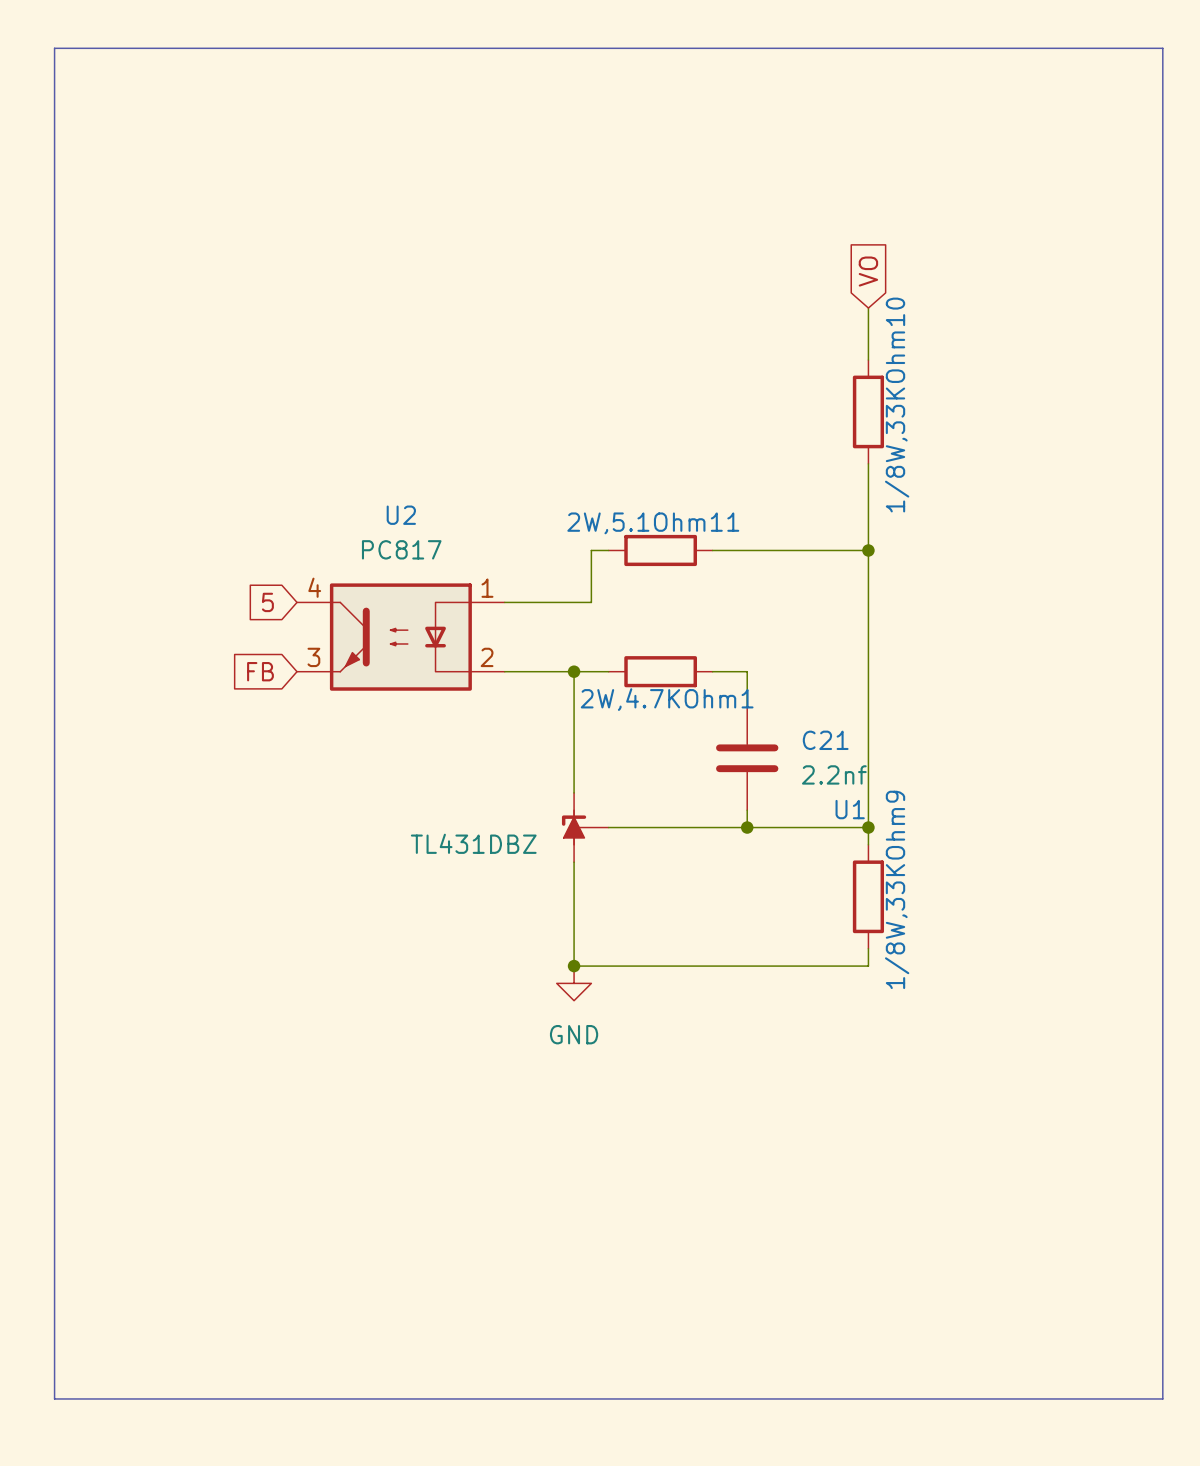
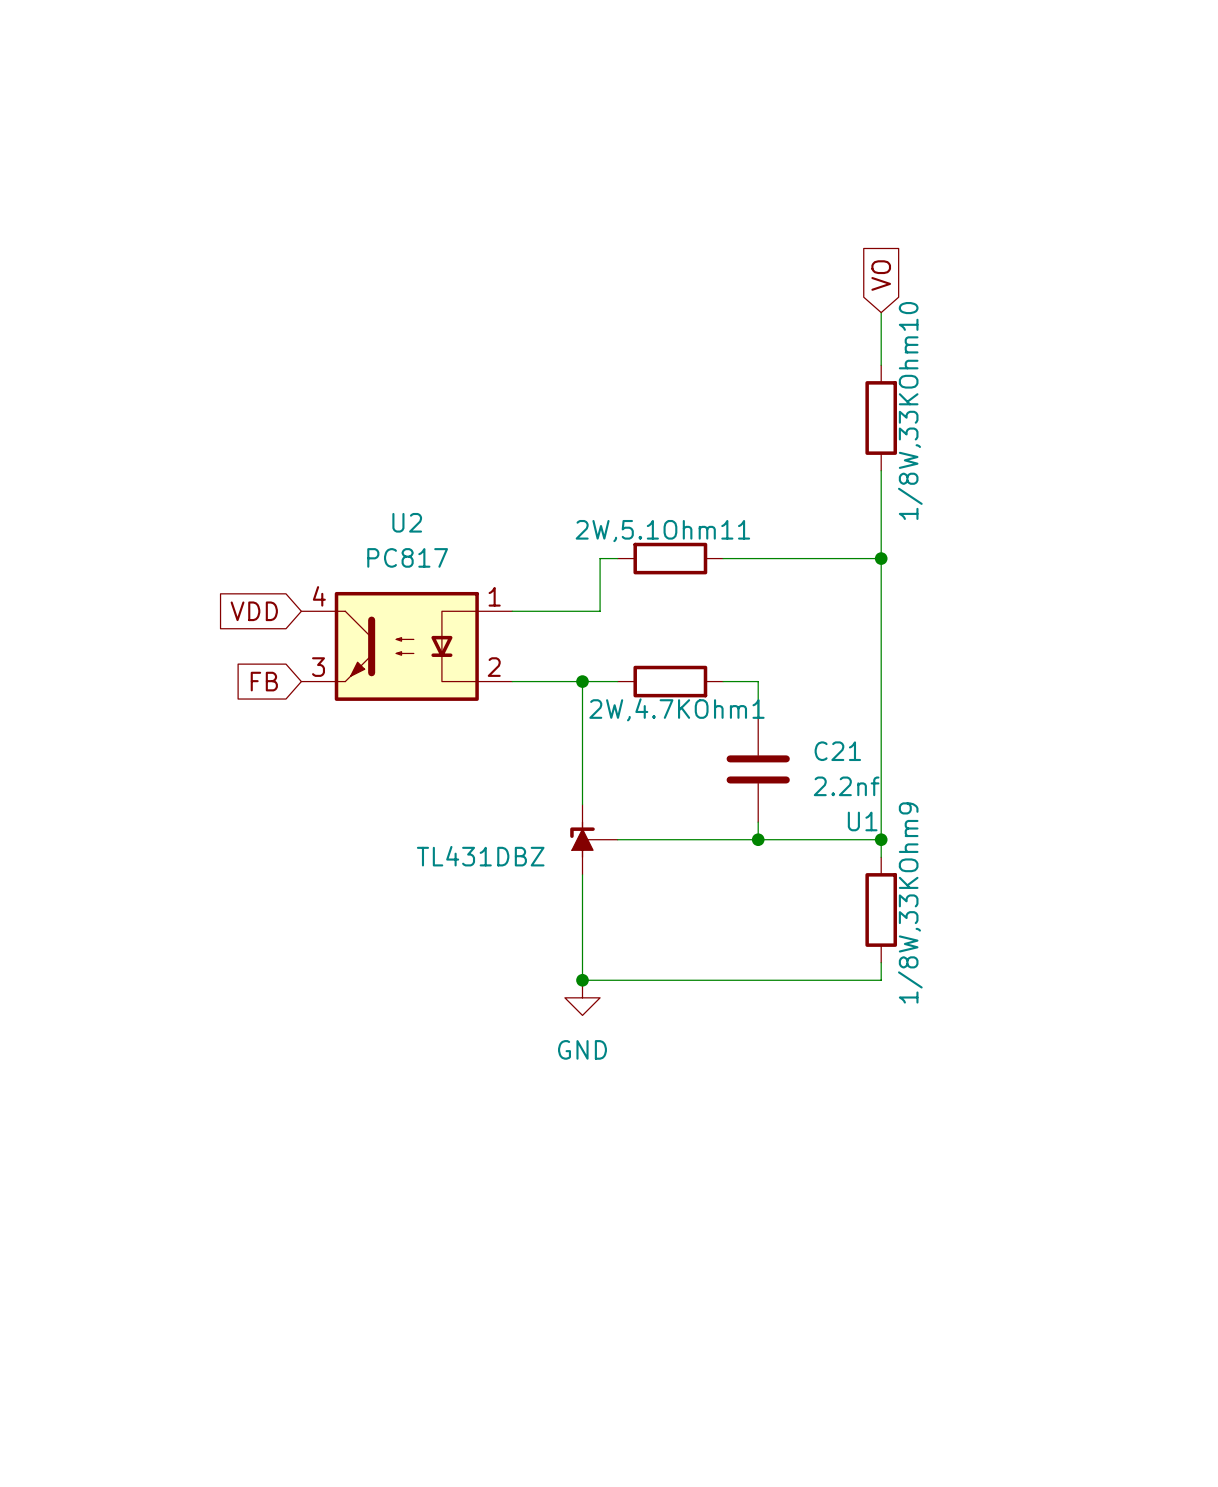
line: (54, 48) (1162, 48) (1162, 1398) (54, 1398) (54, 48) -> none
global label: 5 (267, 602) -> VDD (254, 611)

